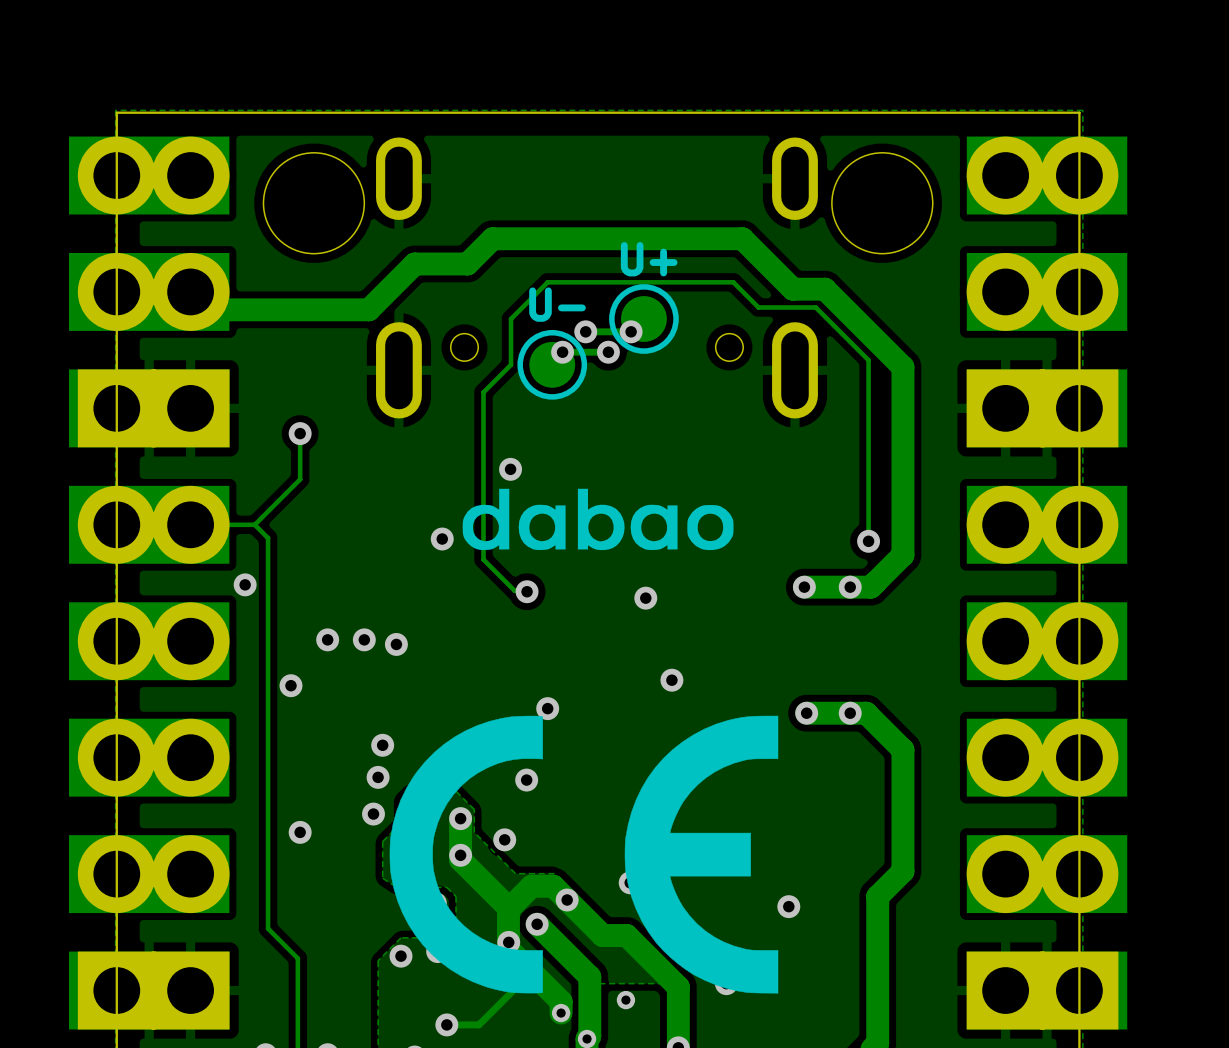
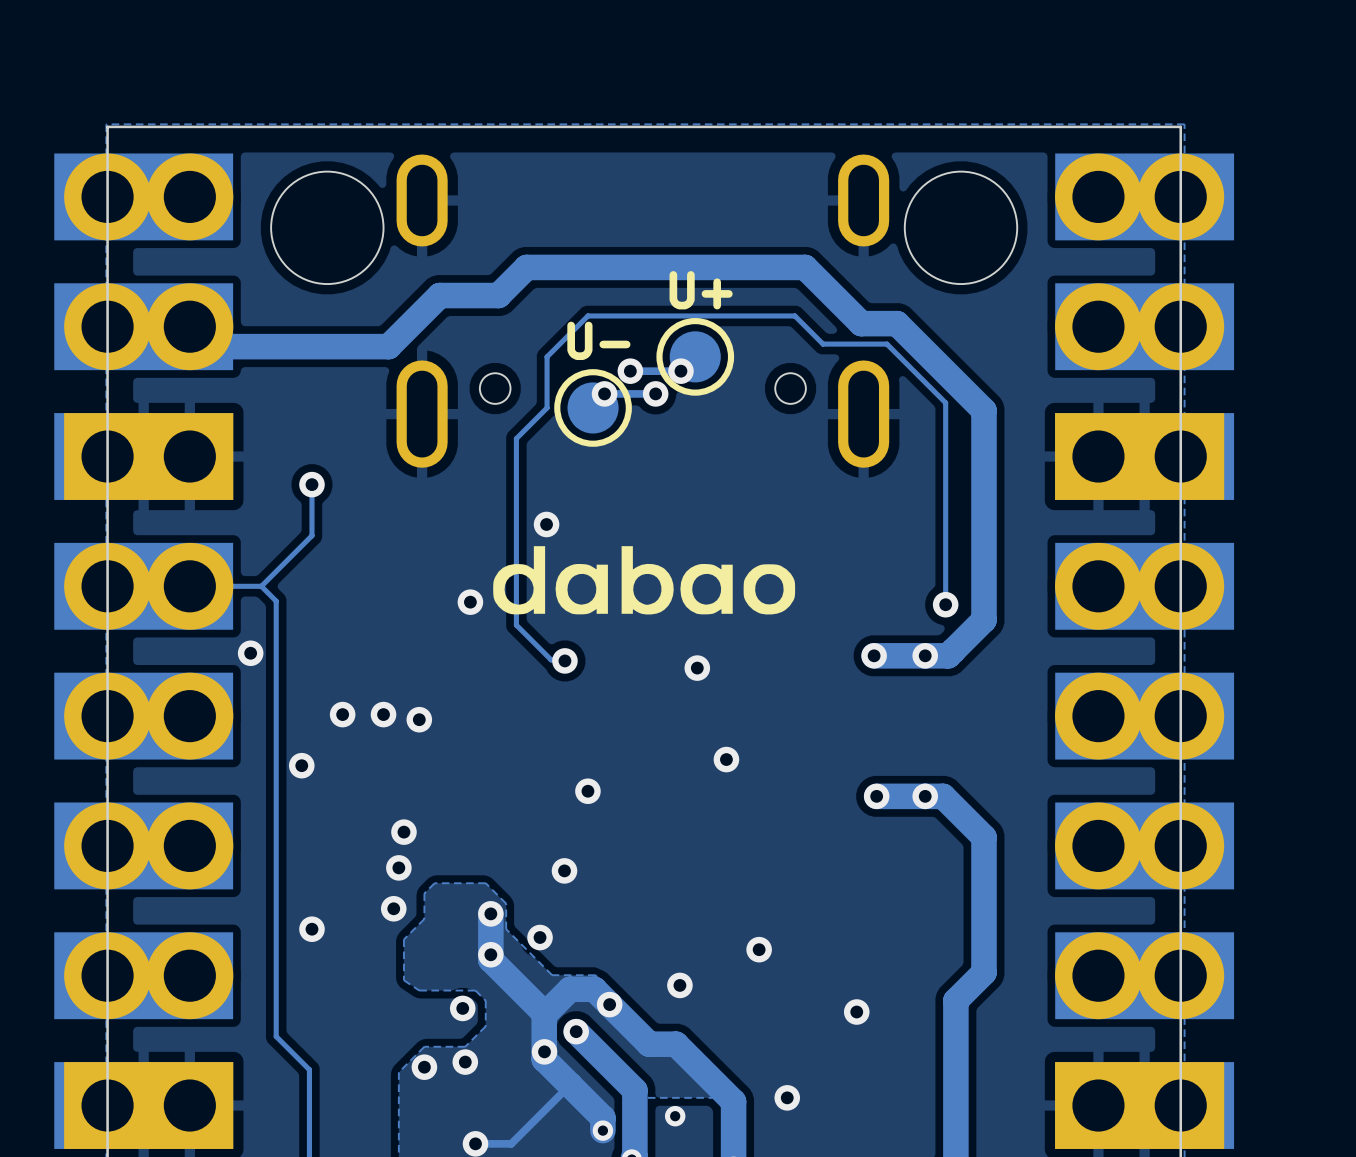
drawing: [389, 715, 779, 994] -> none

